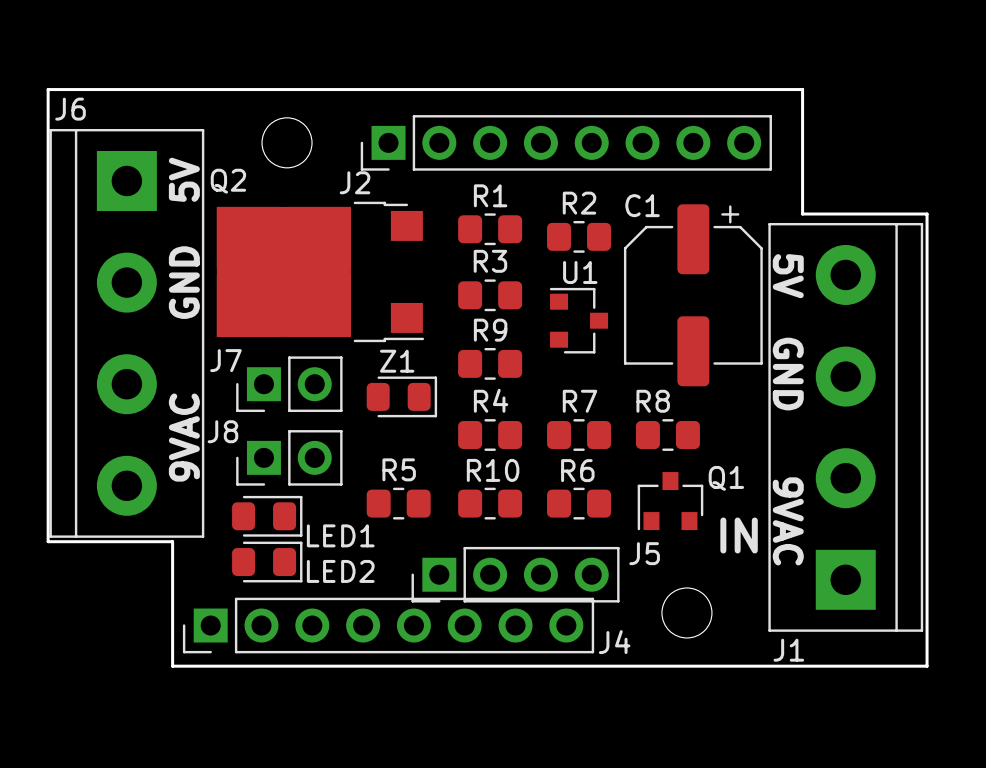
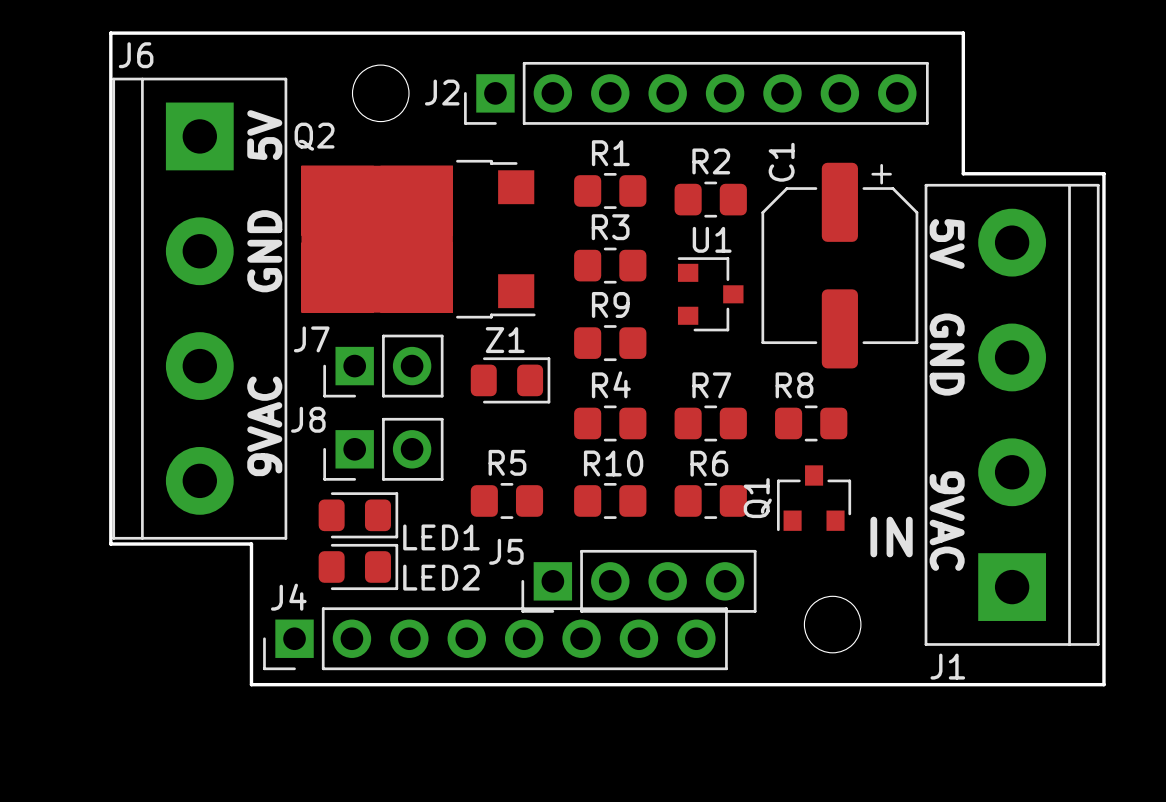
J2 name position: J2 (355, 182) -> J2 (442, 92)
C1 name rotation: 0° (642, 205) -> 90° counterclockwise (781, 162)
Q1 name rotation: 0° (726, 478) -> 90° counterclockwise (757, 498)
Q1 name position: Q1 (726, 478) -> Q1 (757, 498)
J5 name position: J5 (644, 553) -> J5 (506, 551)
J4 name position: J4 (614, 642) -> J4 (288, 597)

